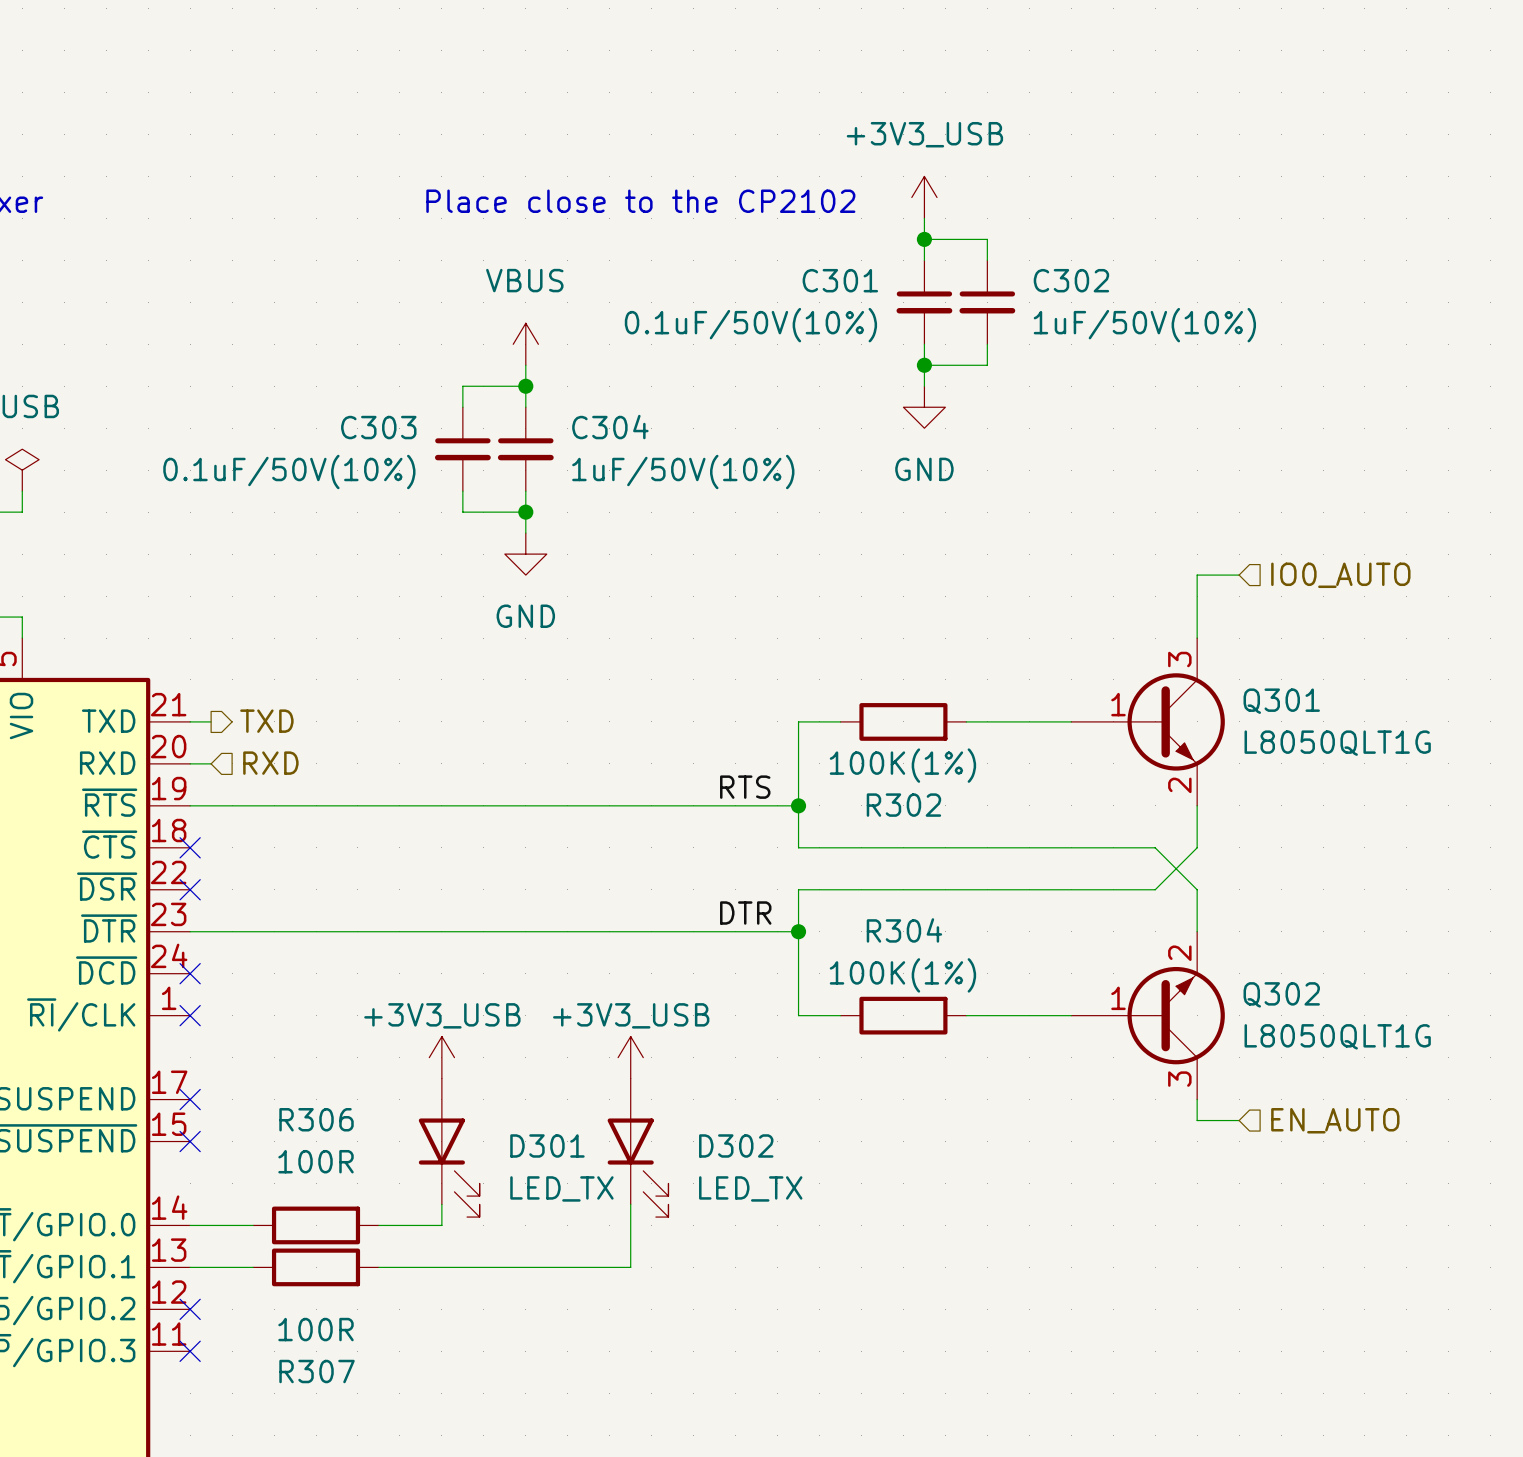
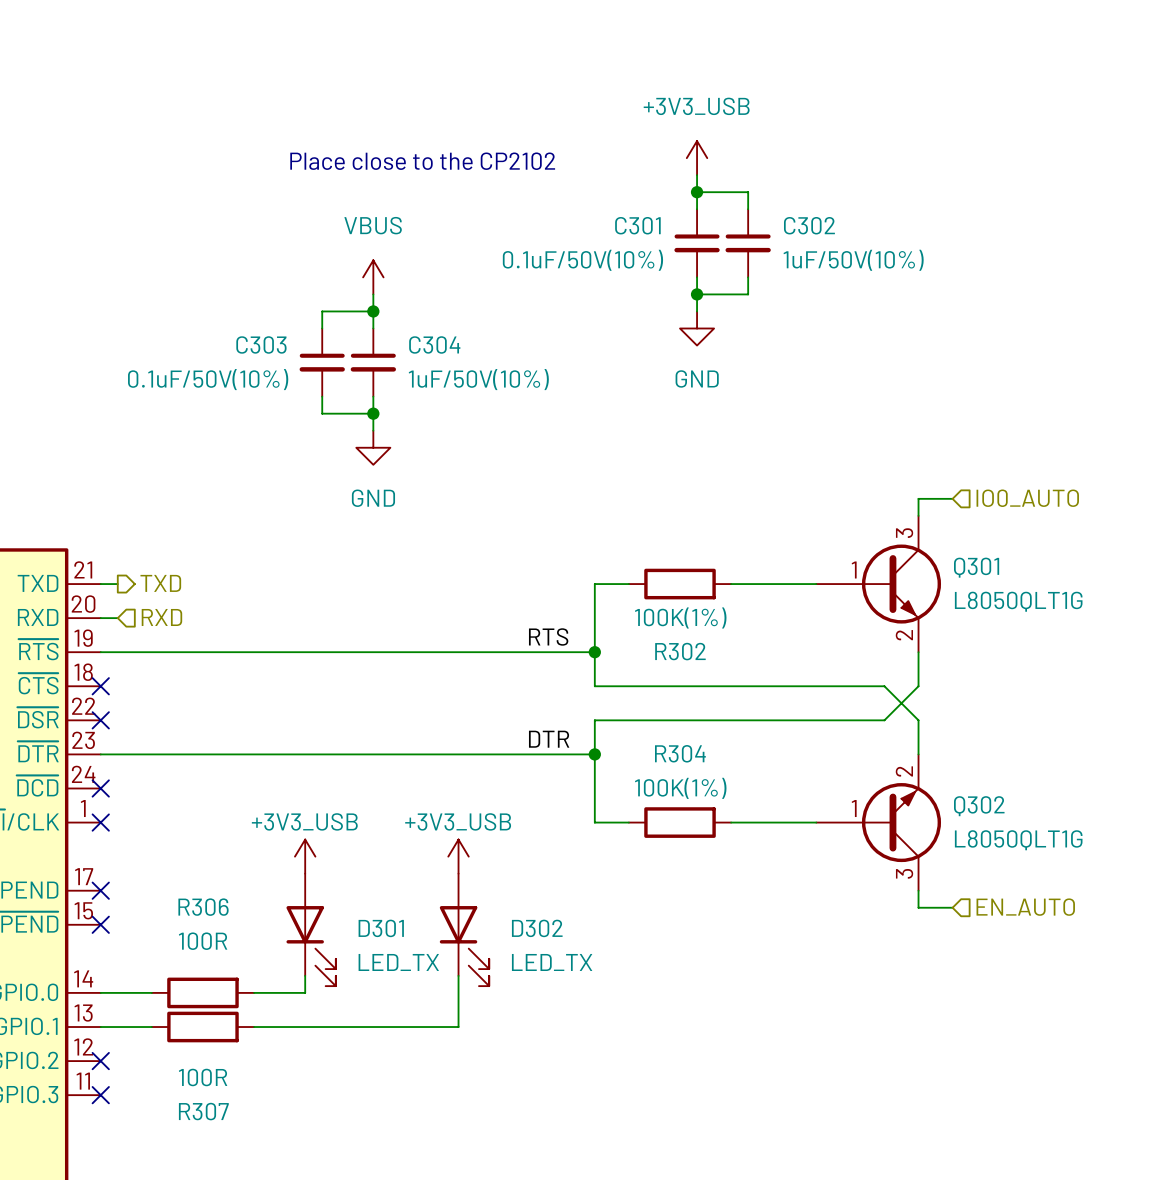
wire: (1239, 575) (1197, 575) (1197, 617) -> (952, 498) (918, 498)
hierarchical label position: IO0_AUTO (1340, 575) -> IO0_AUTO (1027, 498)

